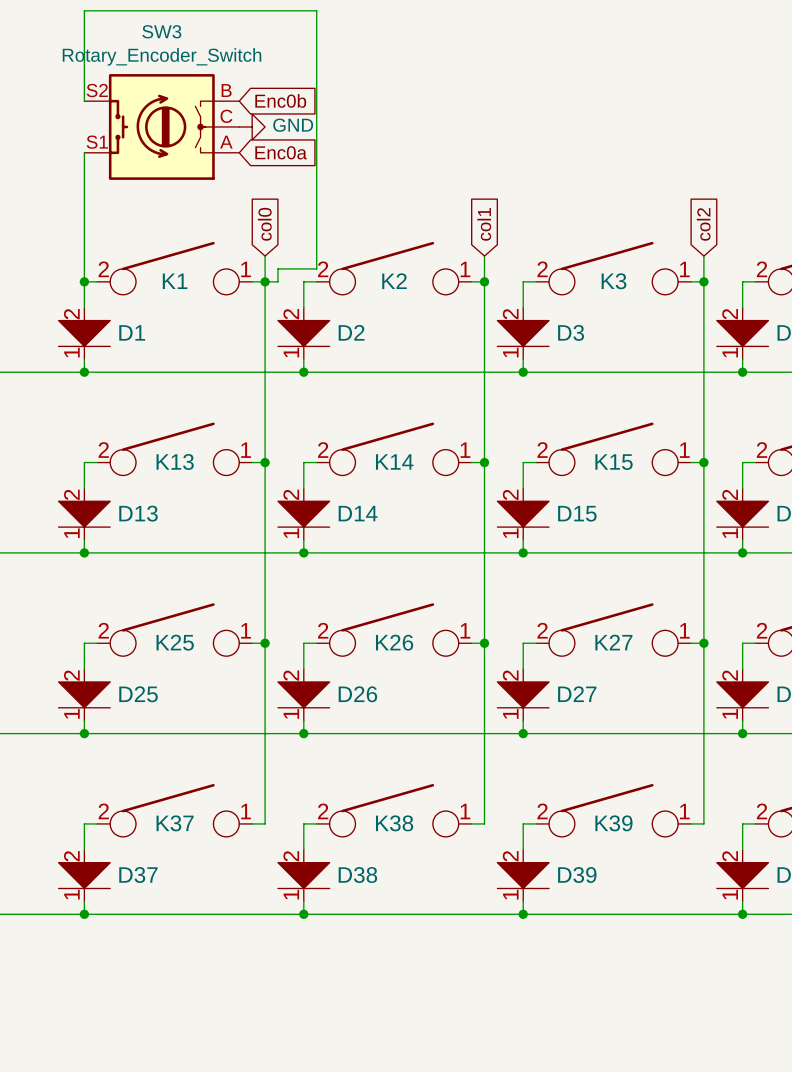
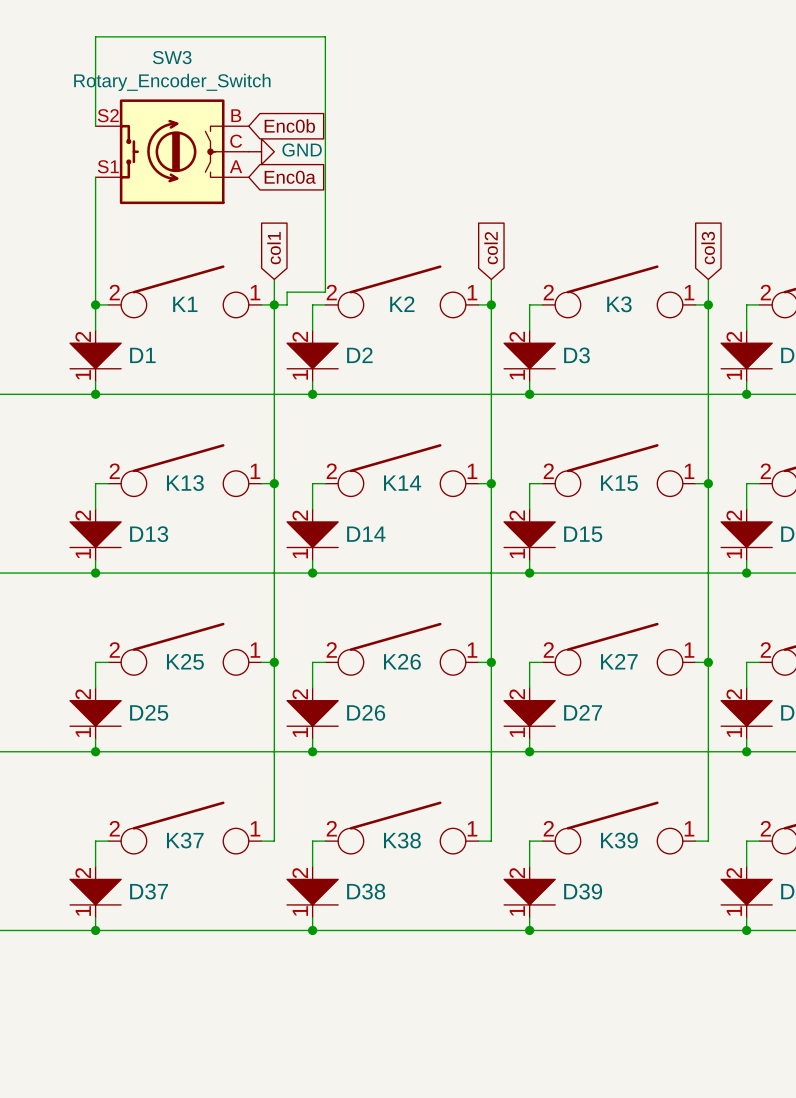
global label: col0 (264, 224) -> col1 (274, 248)
global label: col1 (484, 224) -> col2 (491, 248)
global label: col2 (703, 224) -> col3 (708, 248)

